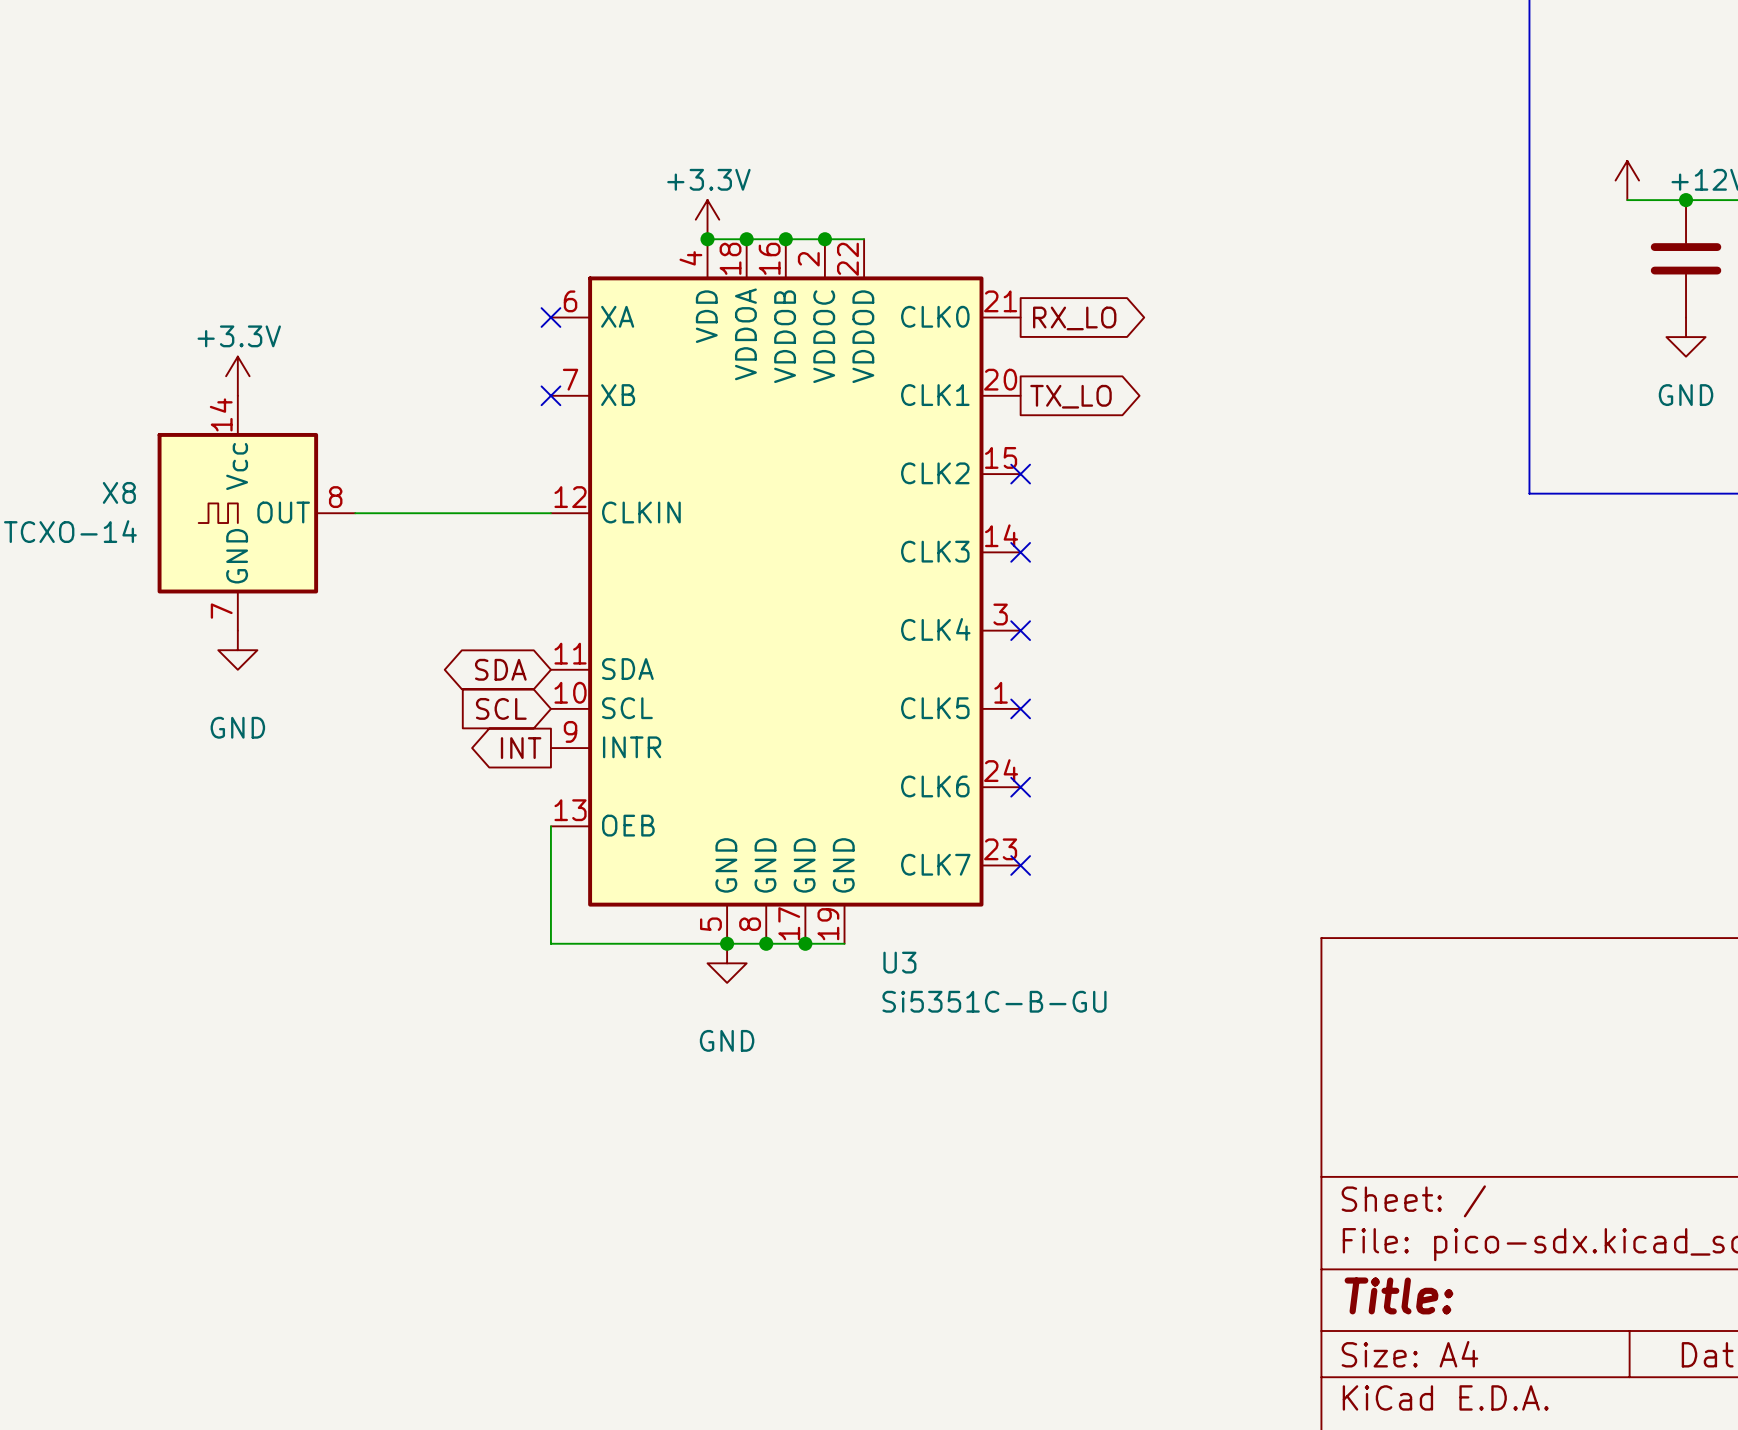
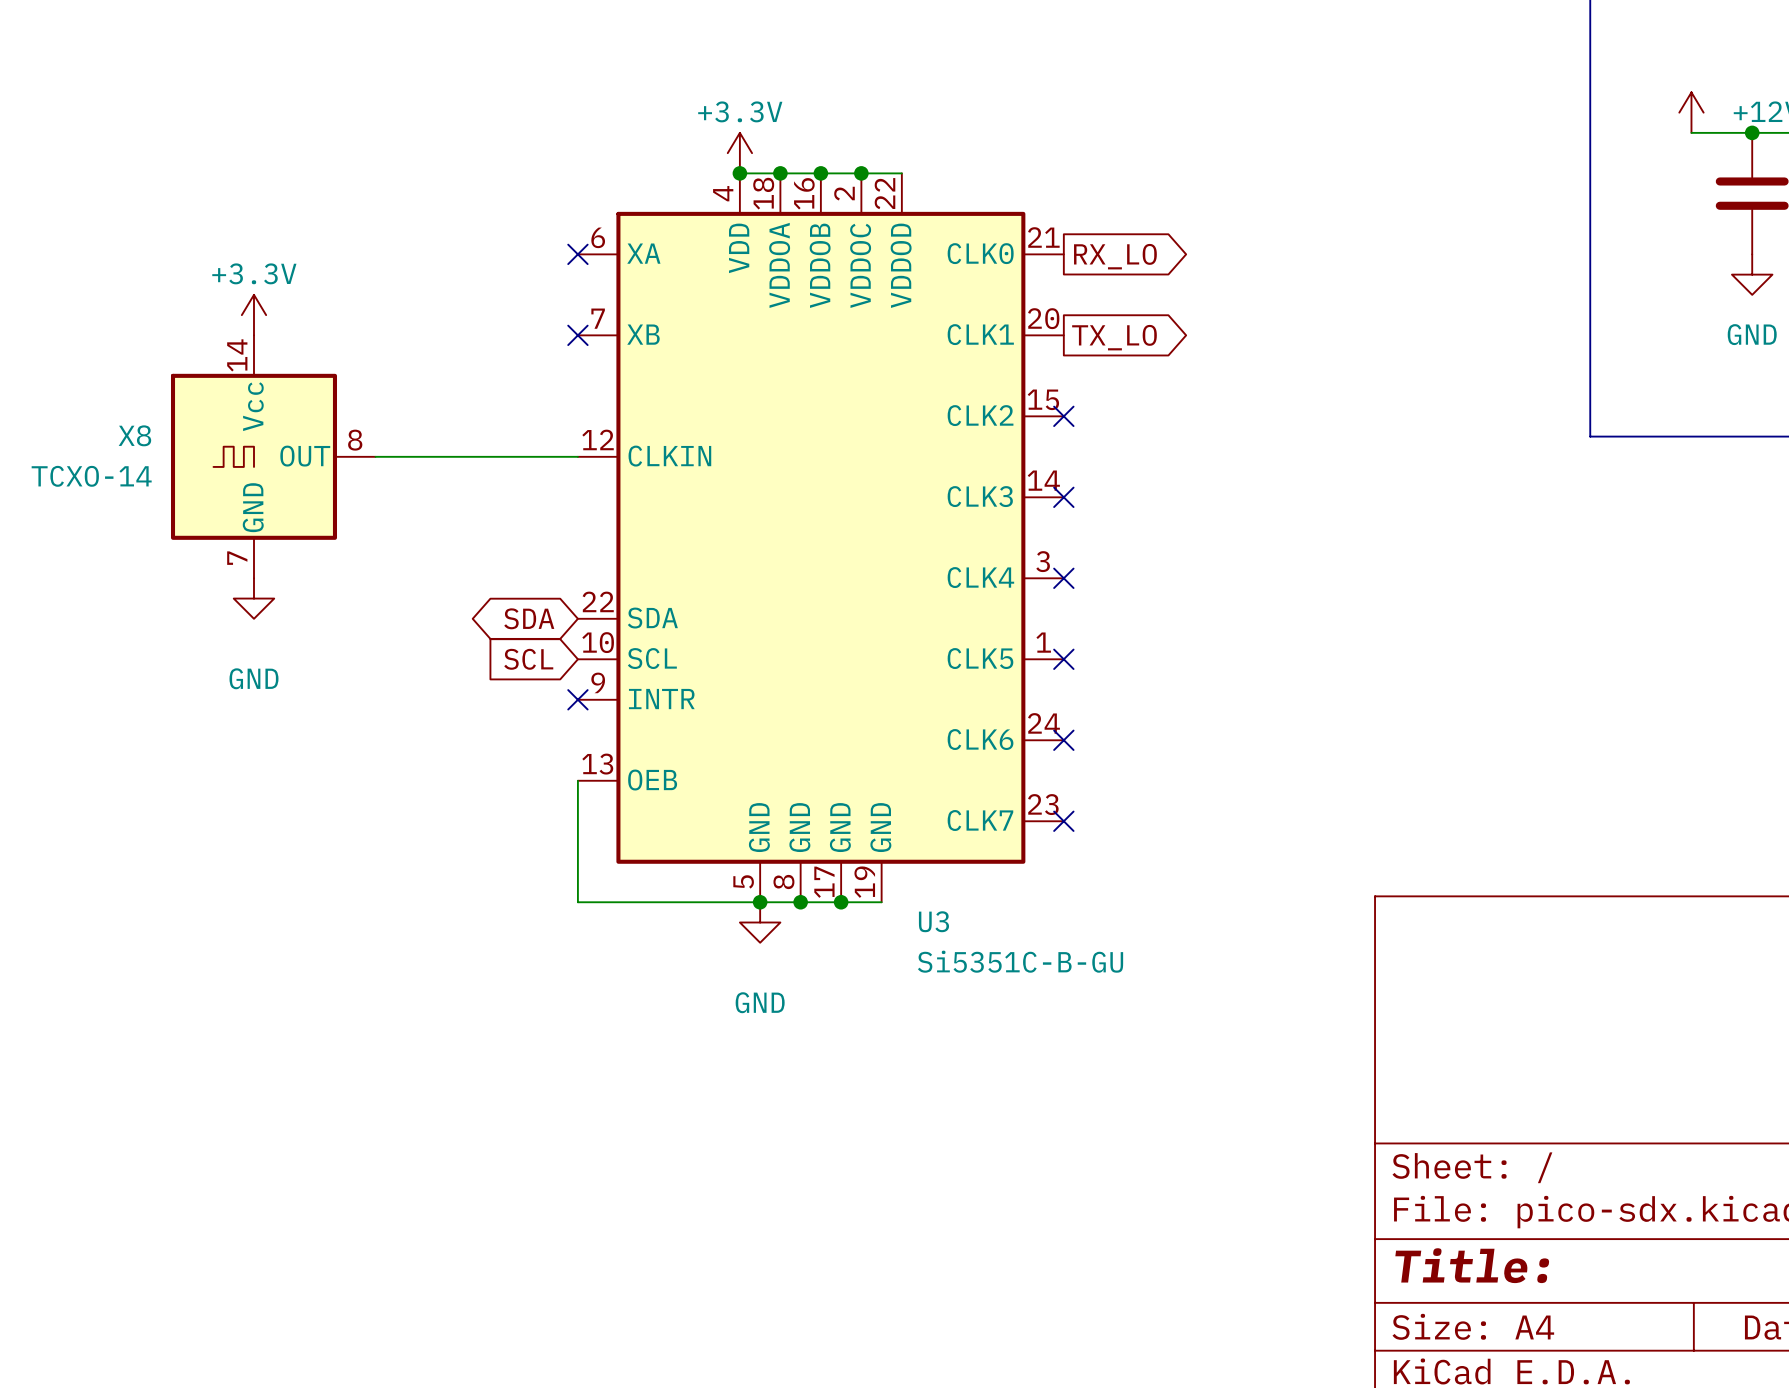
U3 pin number: 11 (570, 653) -> 22 (598, 601)
global label: INT (521, 748) -> none
no-connect mark: none -> (577, 699)

